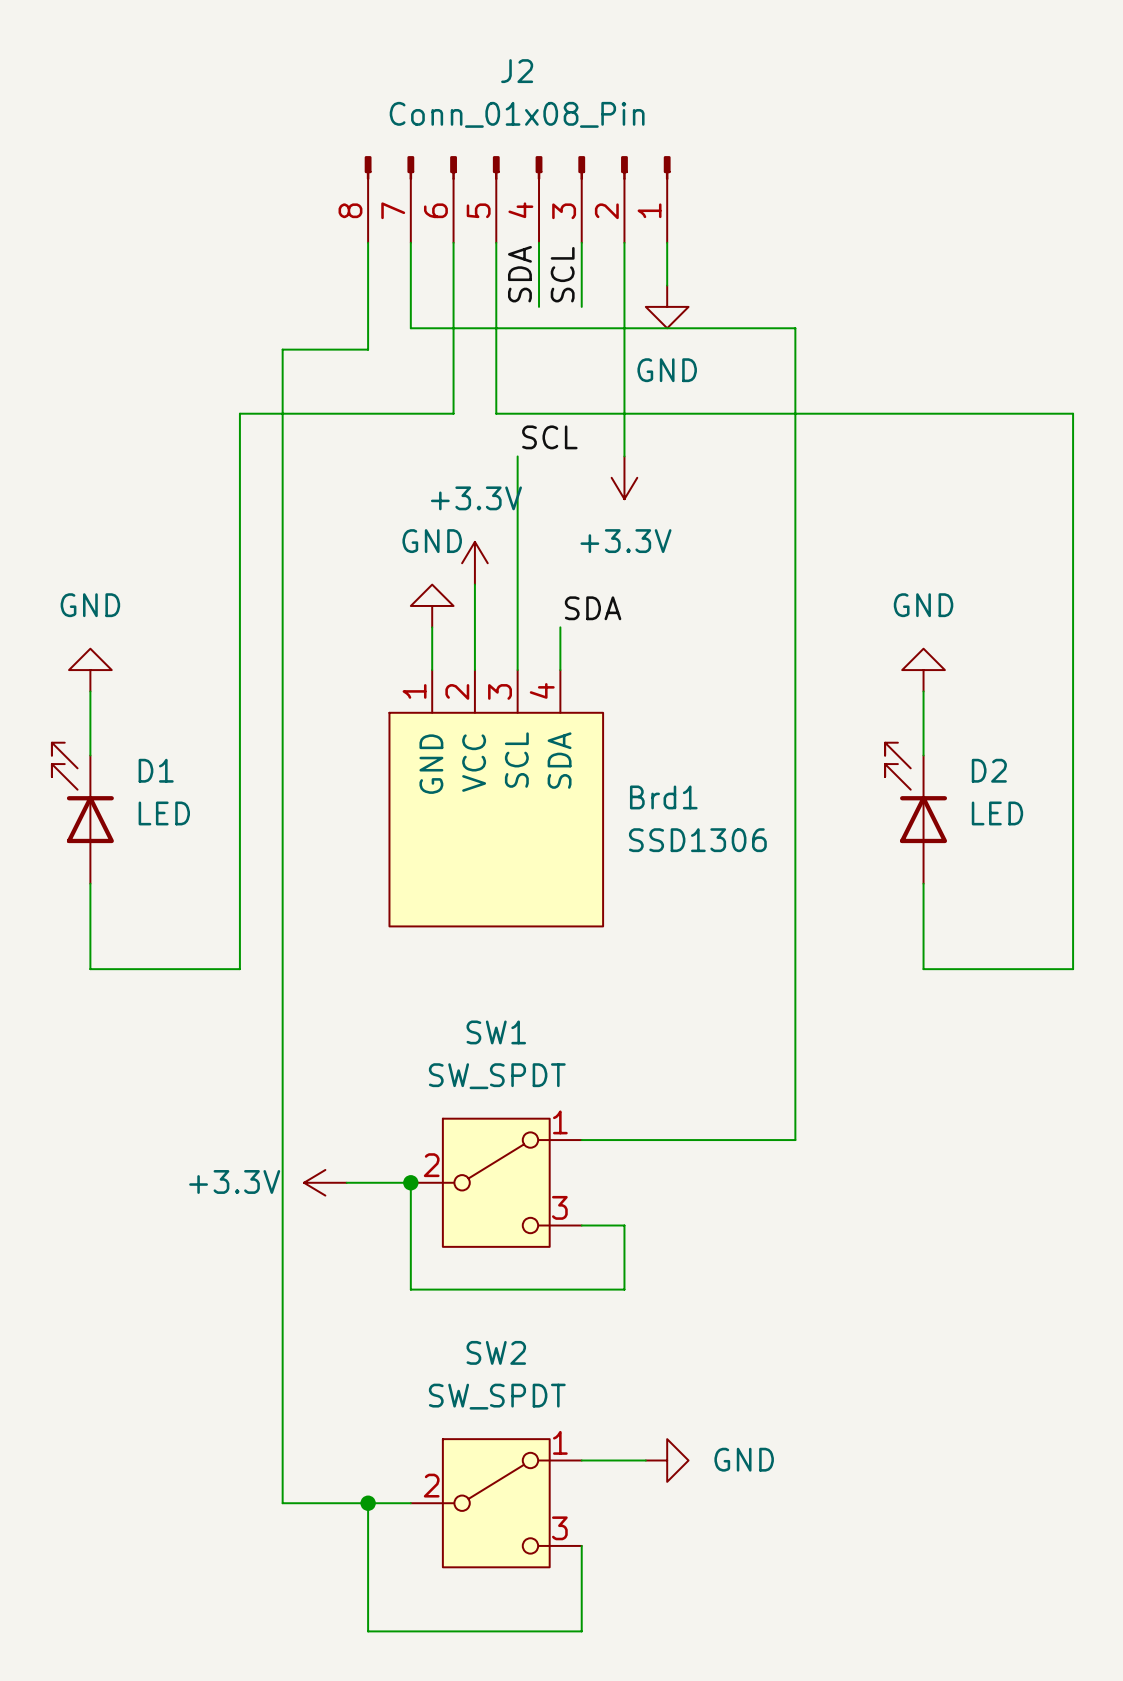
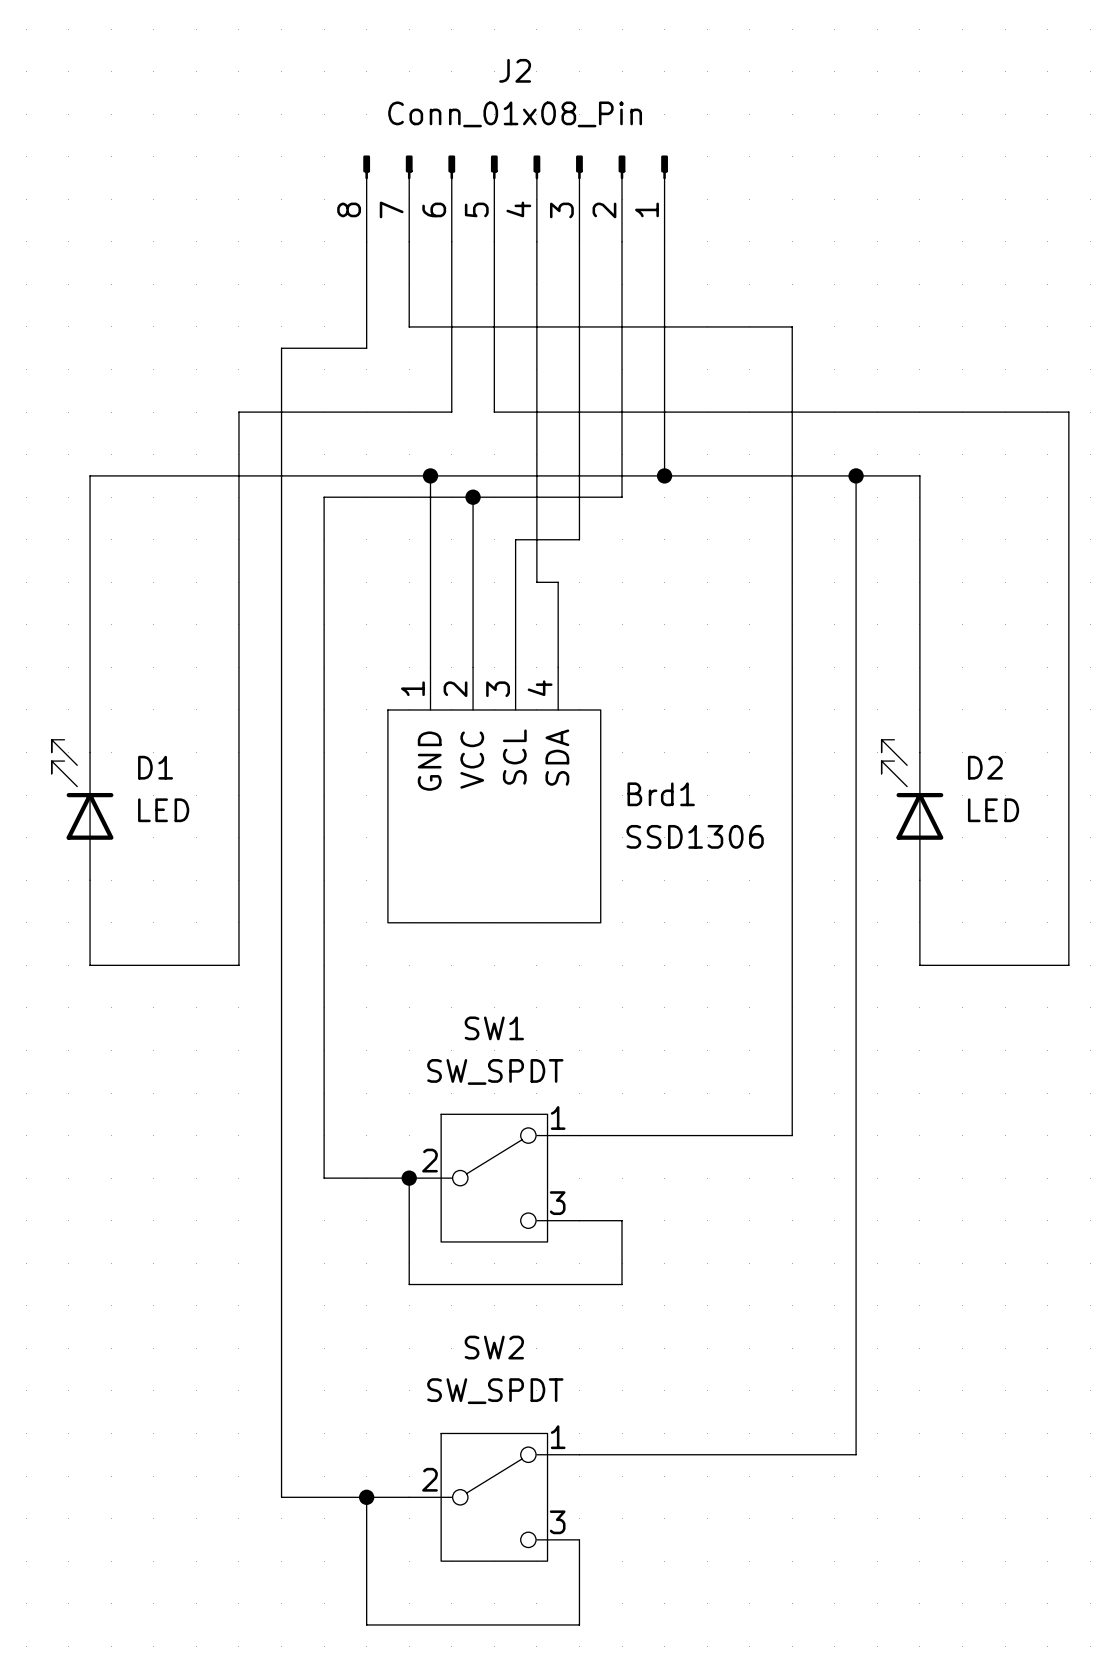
label: SDA (519, 274) -> none
label: SCL (562, 274) -> none
wire: none -> (664, 284) (664, 475)
wire: none -> (536, 305) (536, 582) (558, 582) (558, 624)
power symbol: GND (667, 306) -> none
label: SCL (549, 437) -> none
wire: (517, 456) (517, 541) -> (579, 305) (579, 539) (515, 539)
wire: none -> (622, 454) (622, 497) (324, 497) (324, 1178) (345, 1178)
wire: none -> (430, 475) (430, 624)
junction: none -> (430, 475)
power symbol: +3.3V (624, 477) -> none
junction: none -> (664, 475)
wire: none -> (856, 475) (856, 1454) (643, 1454)
junction: none -> (856, 475)
wire: none -> (473, 497) (473, 582)
junction: none -> (473, 497)
power symbol: +3.3V (474, 563) -> none
power symbol: GND (432, 605) -> none
label: SDA (593, 608) -> none
power symbol: GND (90, 670) -> none
power symbol: GND (923, 670) -> none
wire: none -> (90, 688) (90, 475) (919, 475) (919, 688)
power symbol: +3.3V (325, 1182) -> none
power symbol: GND (667, 1460) -> none

